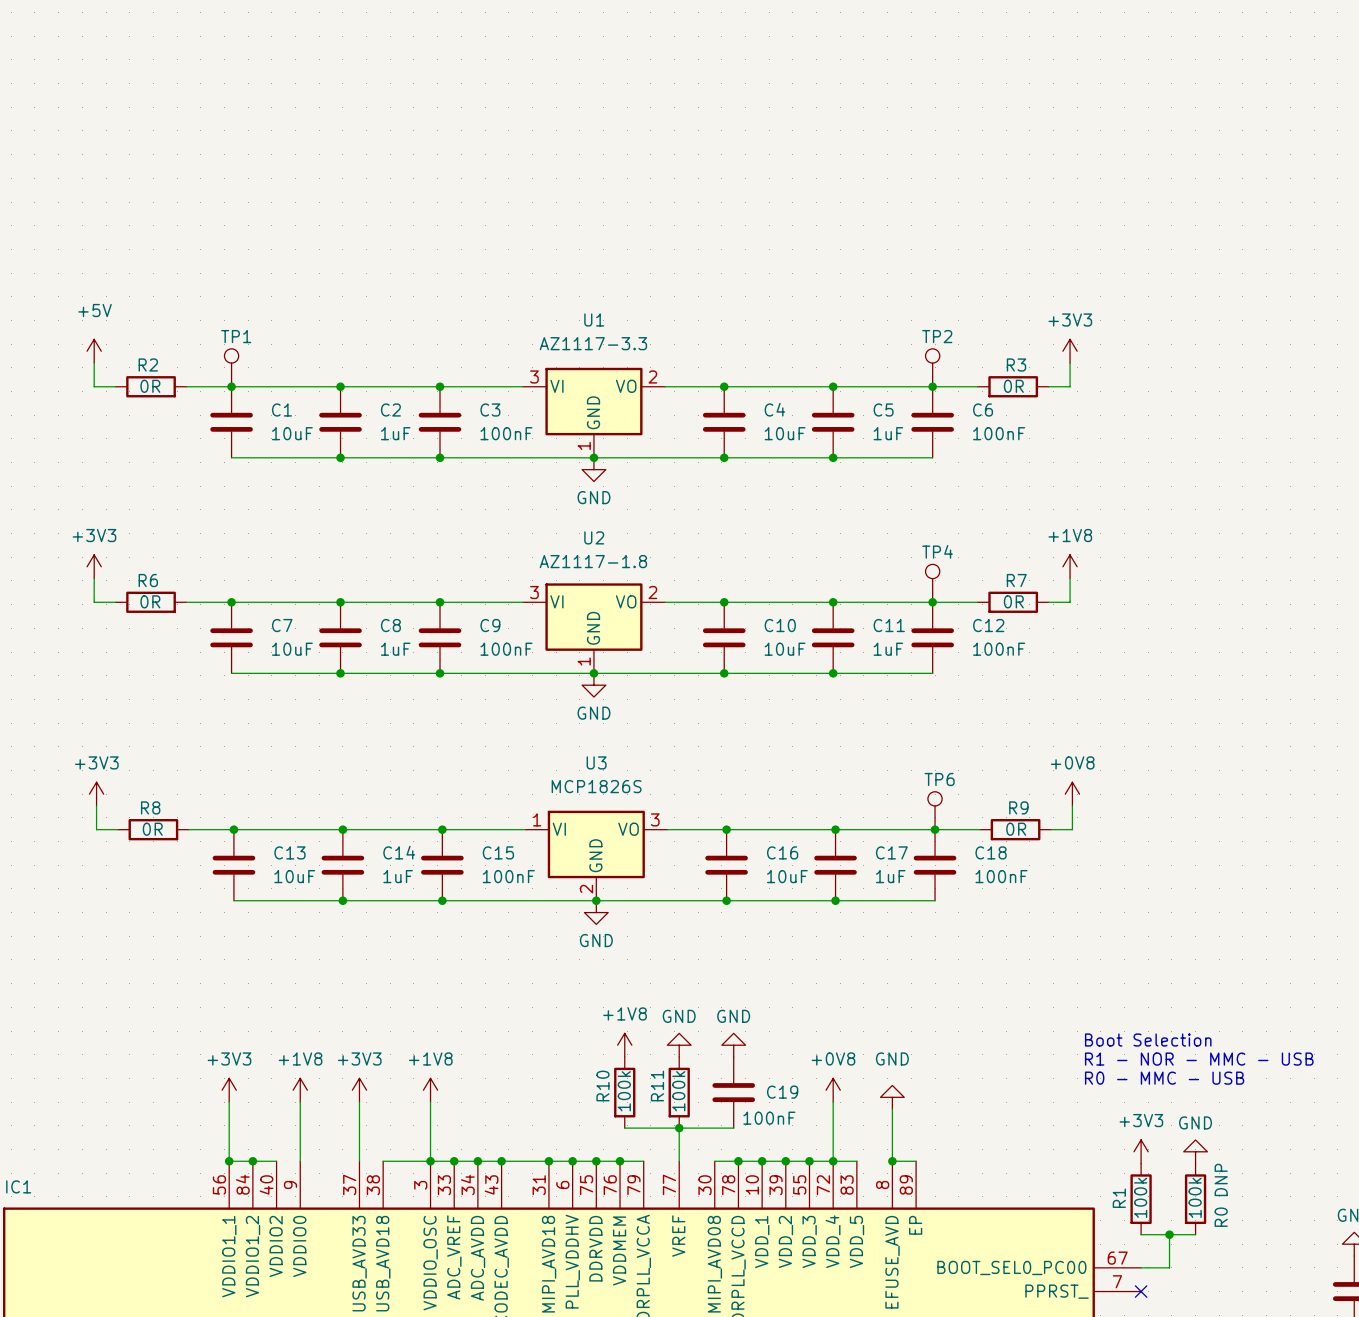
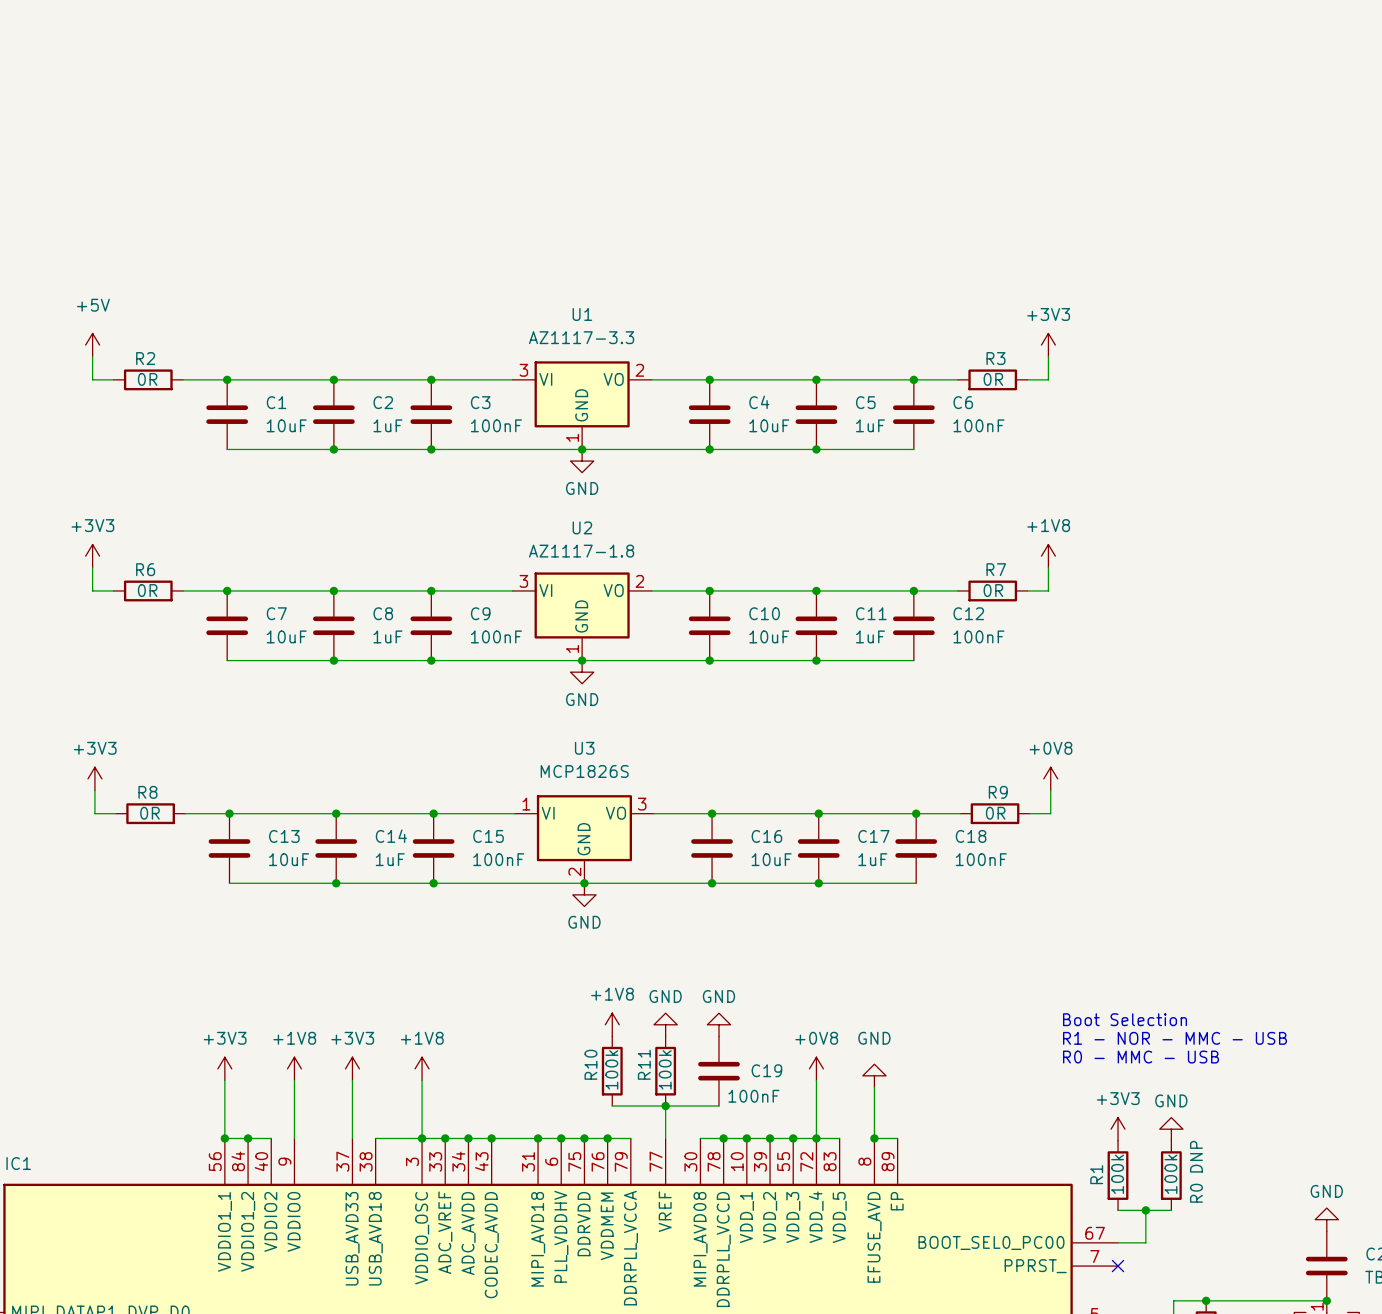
TP1: (231, 367) -> none
TP2: (932, 367) -> none
TP4: (932, 583) -> none
TP6: (935, 810) -> none

